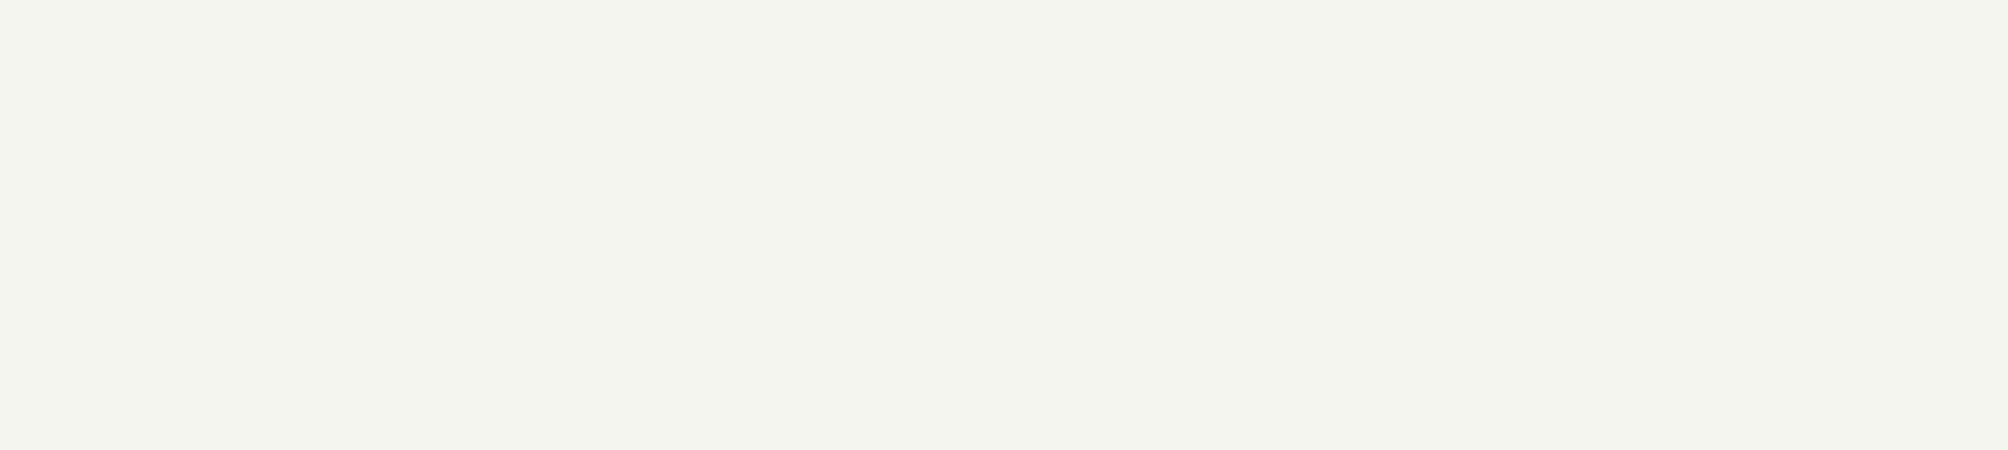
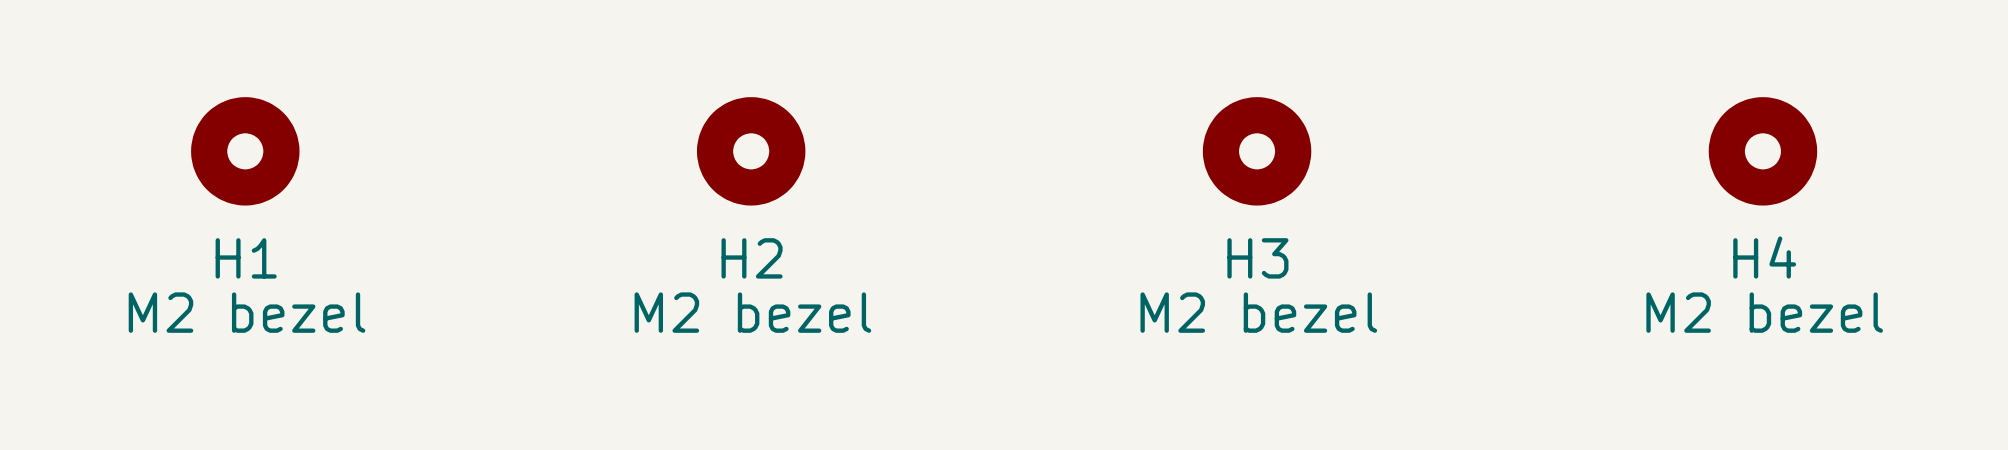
H1: none -> M2 bezel (245, 151)
H2: none -> M2 bezel (751, 151)
H3: none -> M2 bezel (1257, 151)
H4: none -> M2 bezel (1762, 151)

